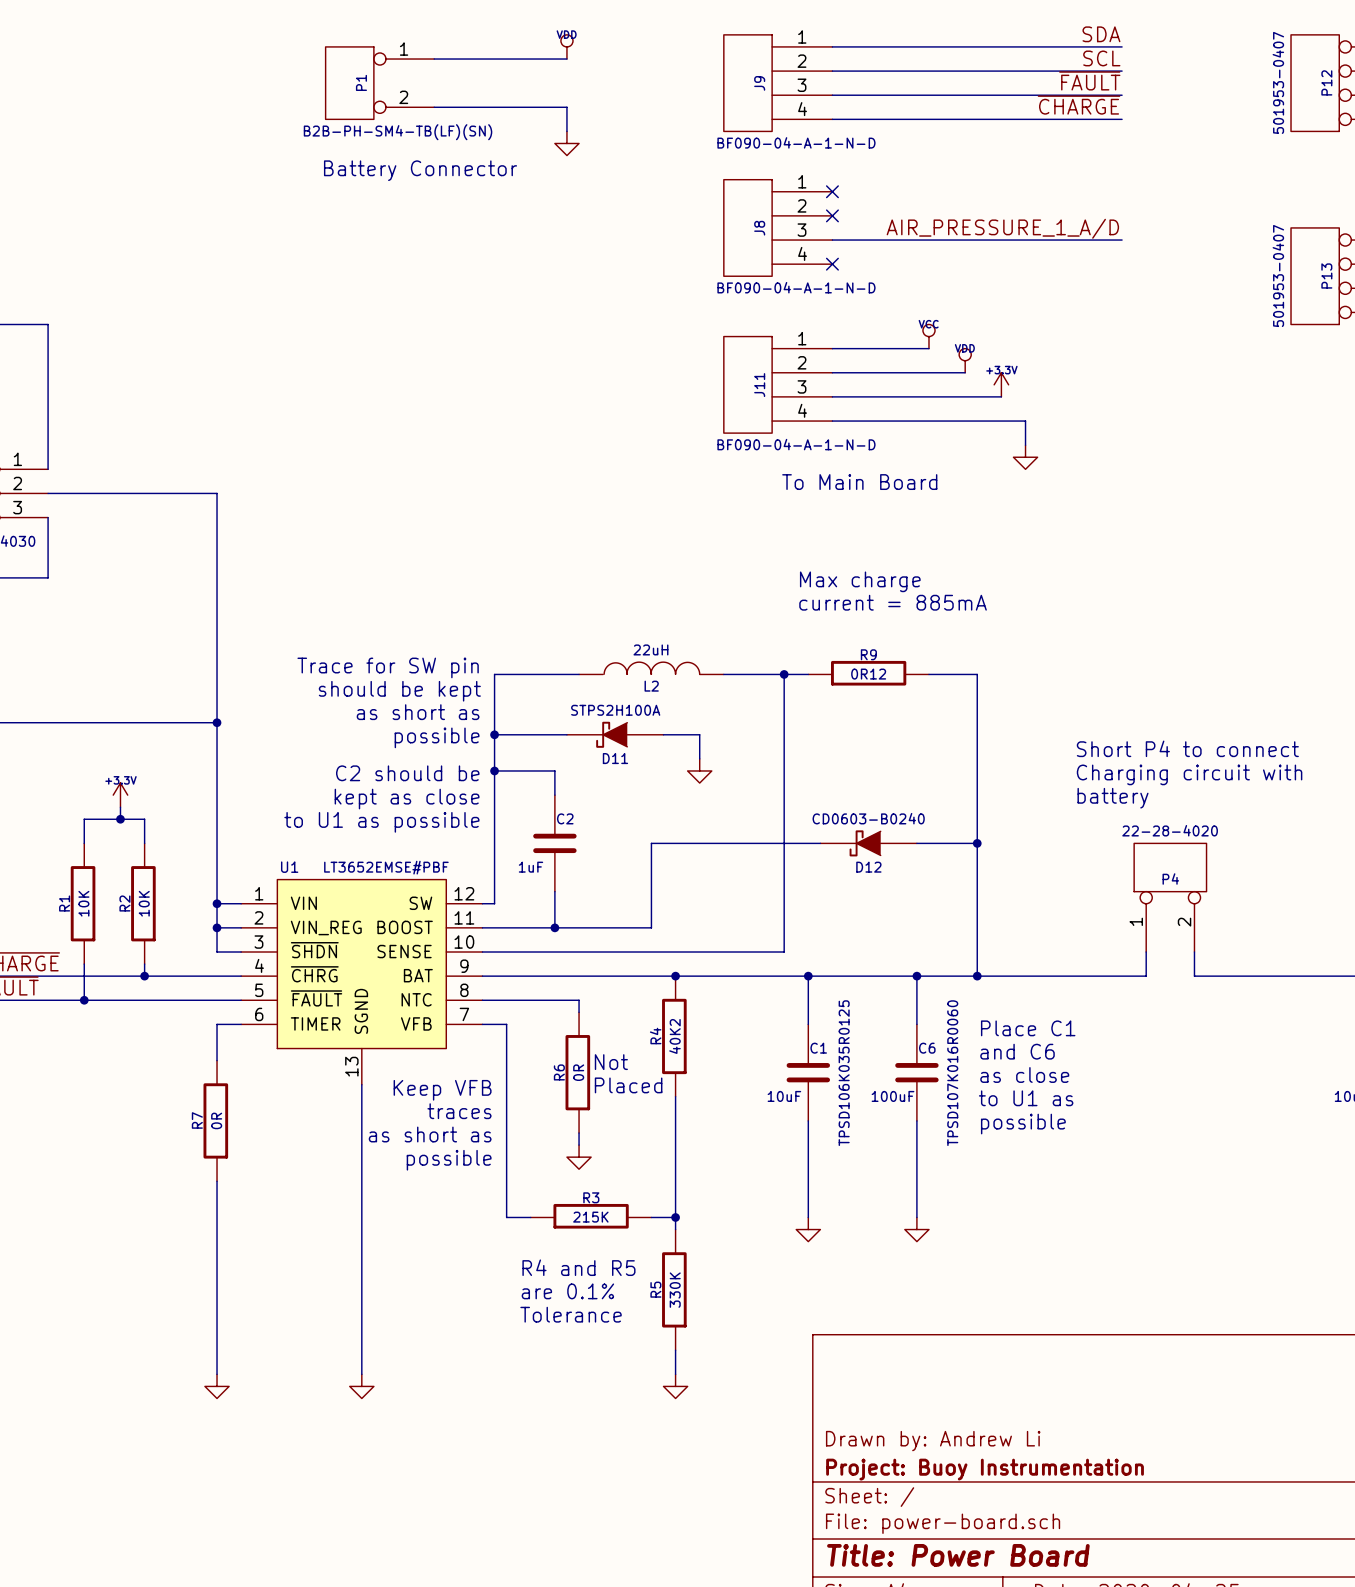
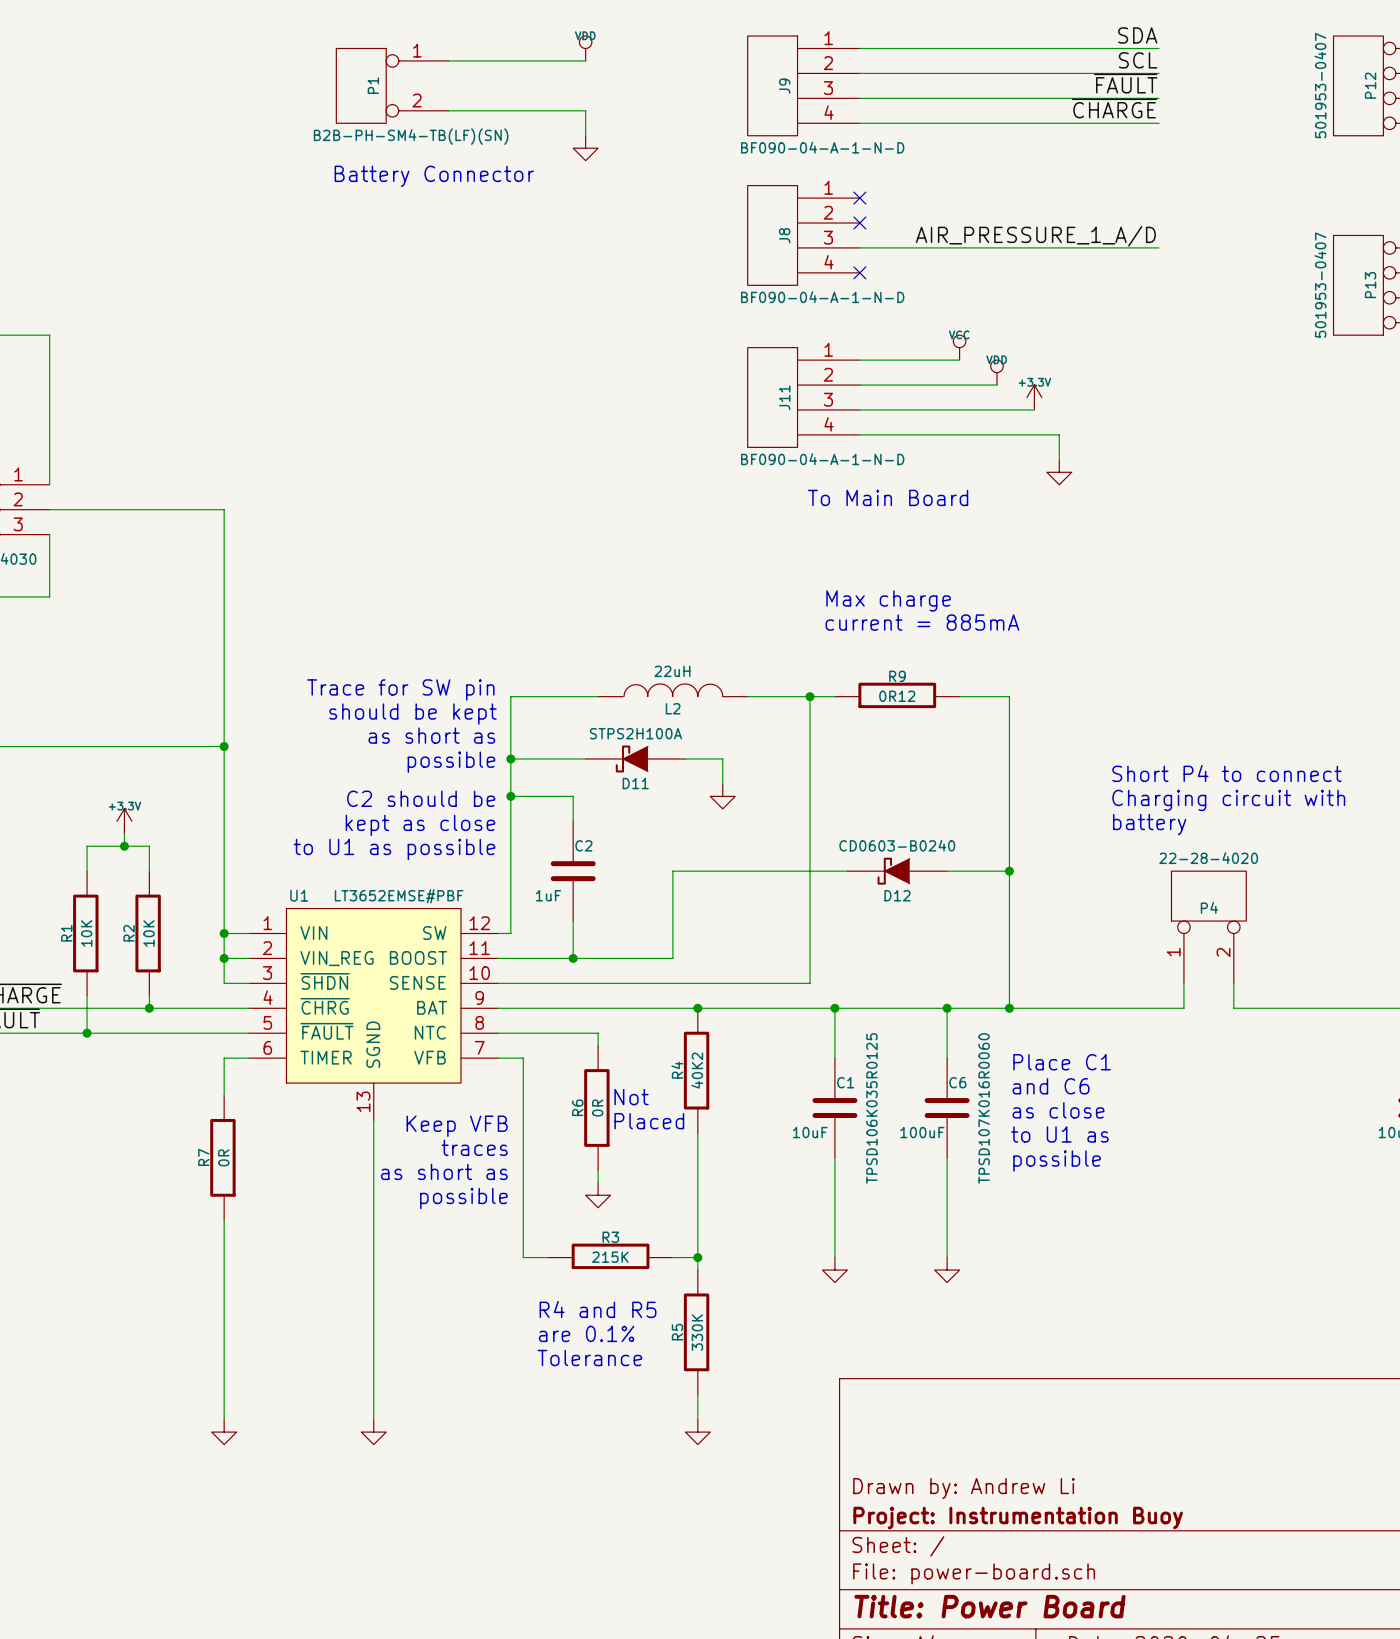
title block: Project: Buoy Instrumentation (985, 1469) -> Project: Instrumentation Buoy (1018, 1517)

